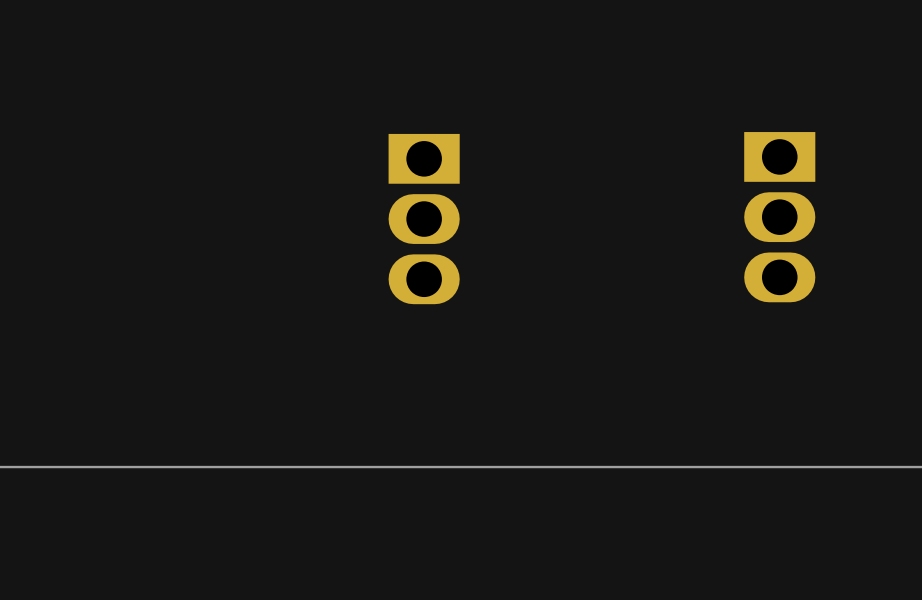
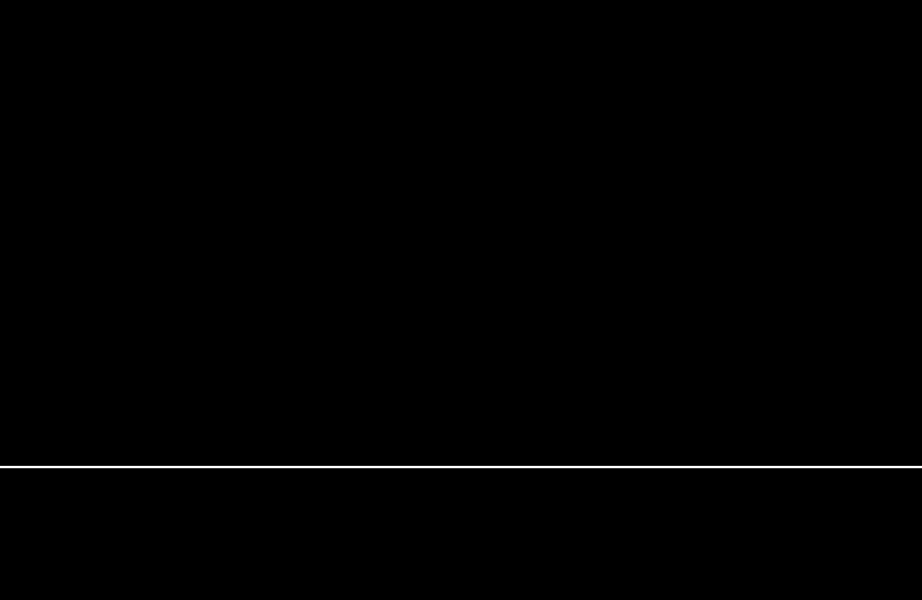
part: (779, 217) -> none
part: (424, 219) -> none

